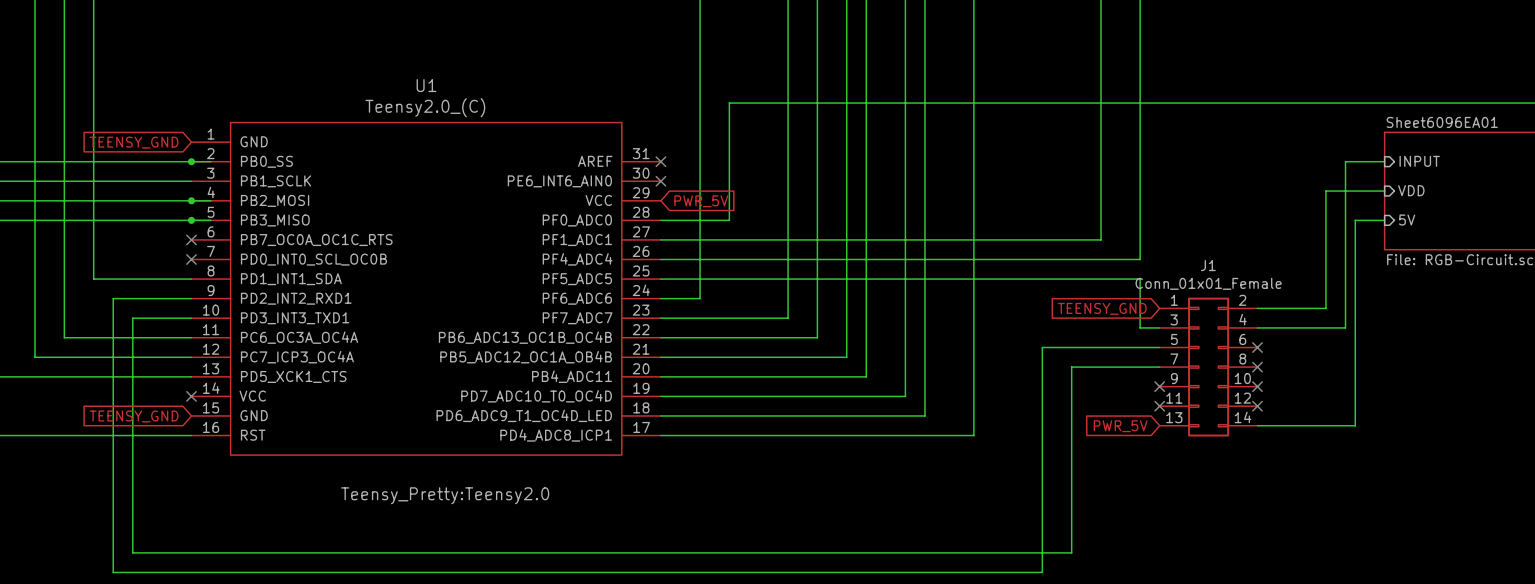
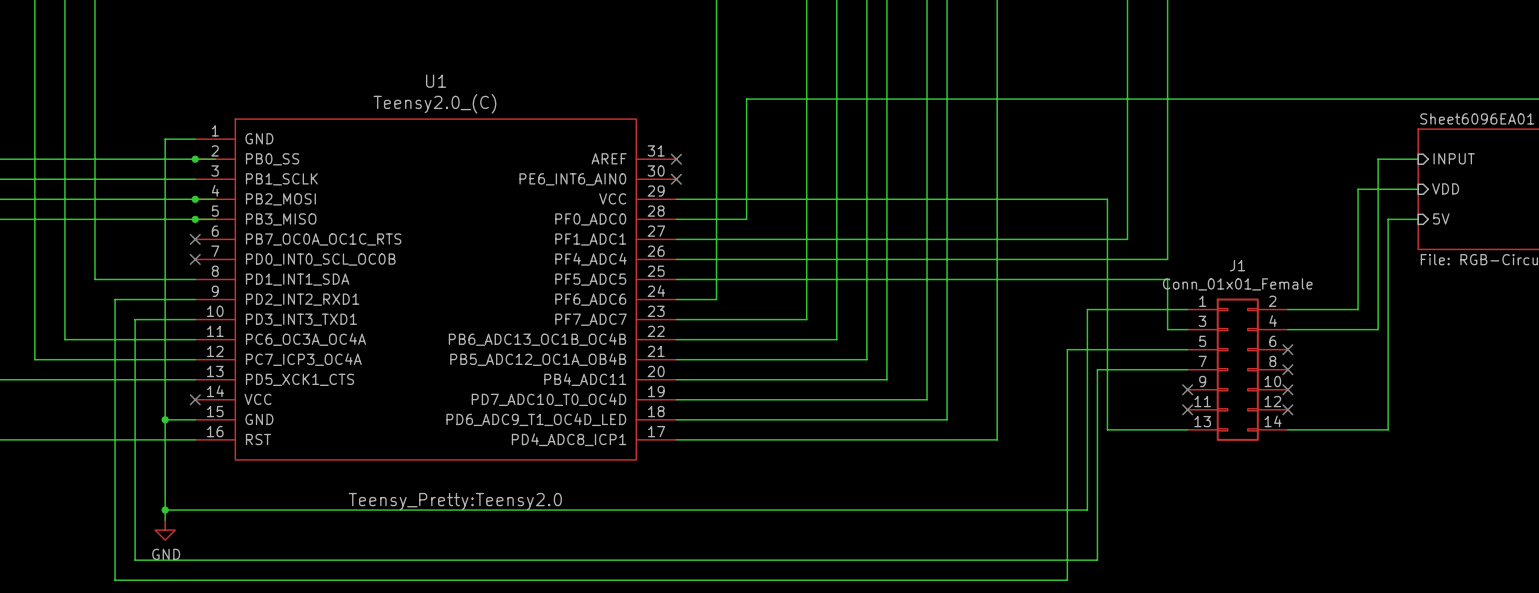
global label: TEENSY_GND (134, 142) -> none
wire: none -> (195, 139) (165, 139) (165, 520)
wire: none -> (676, 199) (1107, 199) (1107, 429) (1187, 429)
global label: PWR_5V (701, 201) -> none
global label: TEENSY_GND (1102, 308) -> none
wire: none -> (1187, 309) (1087, 309) (1087, 510) (165, 510)
wire: none -> (165, 419) (195, 419)
junction: none -> (165, 419)
global label: TEENSY_GND (134, 416) -> none
global label: PWR_5V (1120, 426) -> none
junction: none -> (165, 510)
power symbol: none -> GND (165, 530)

